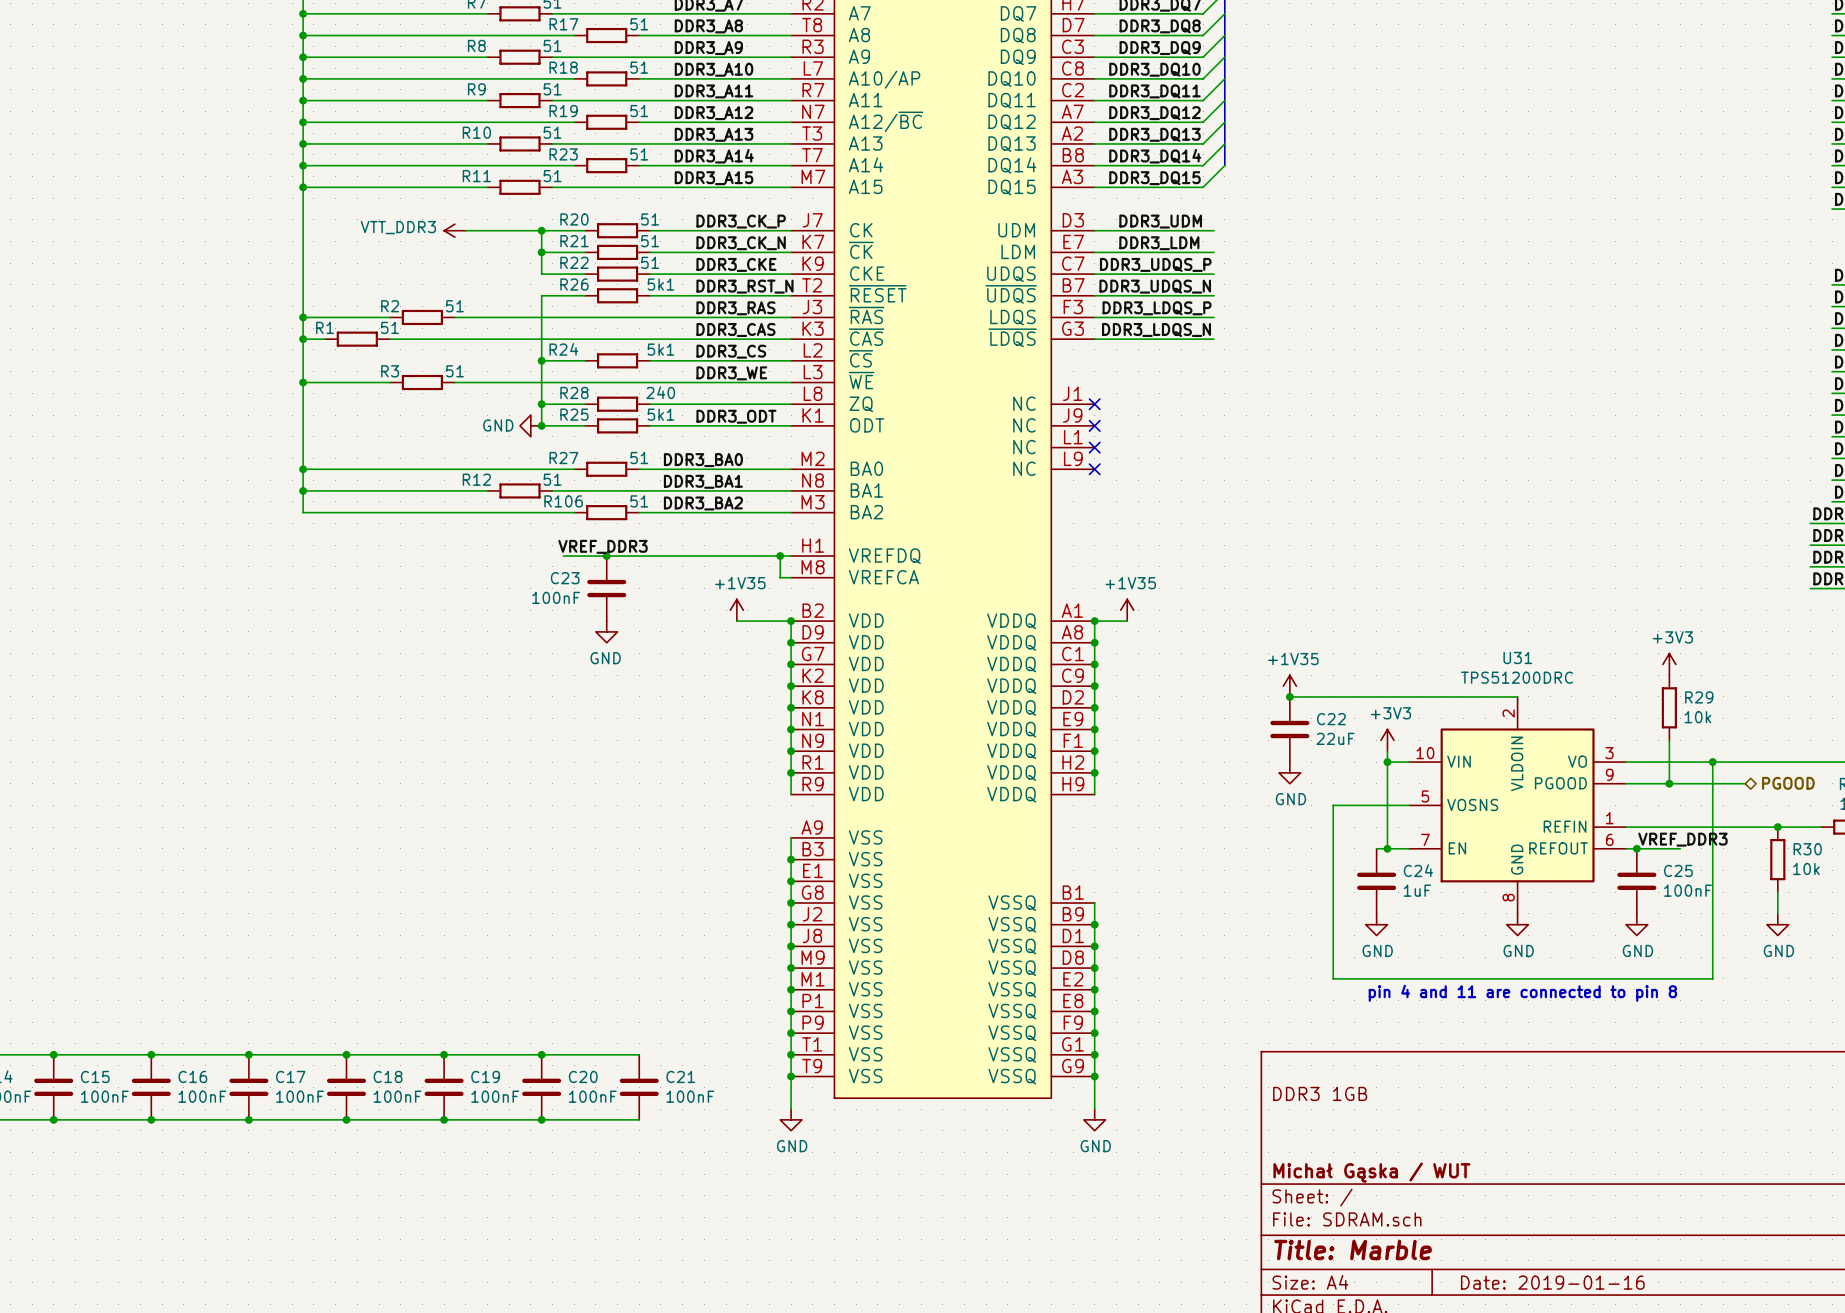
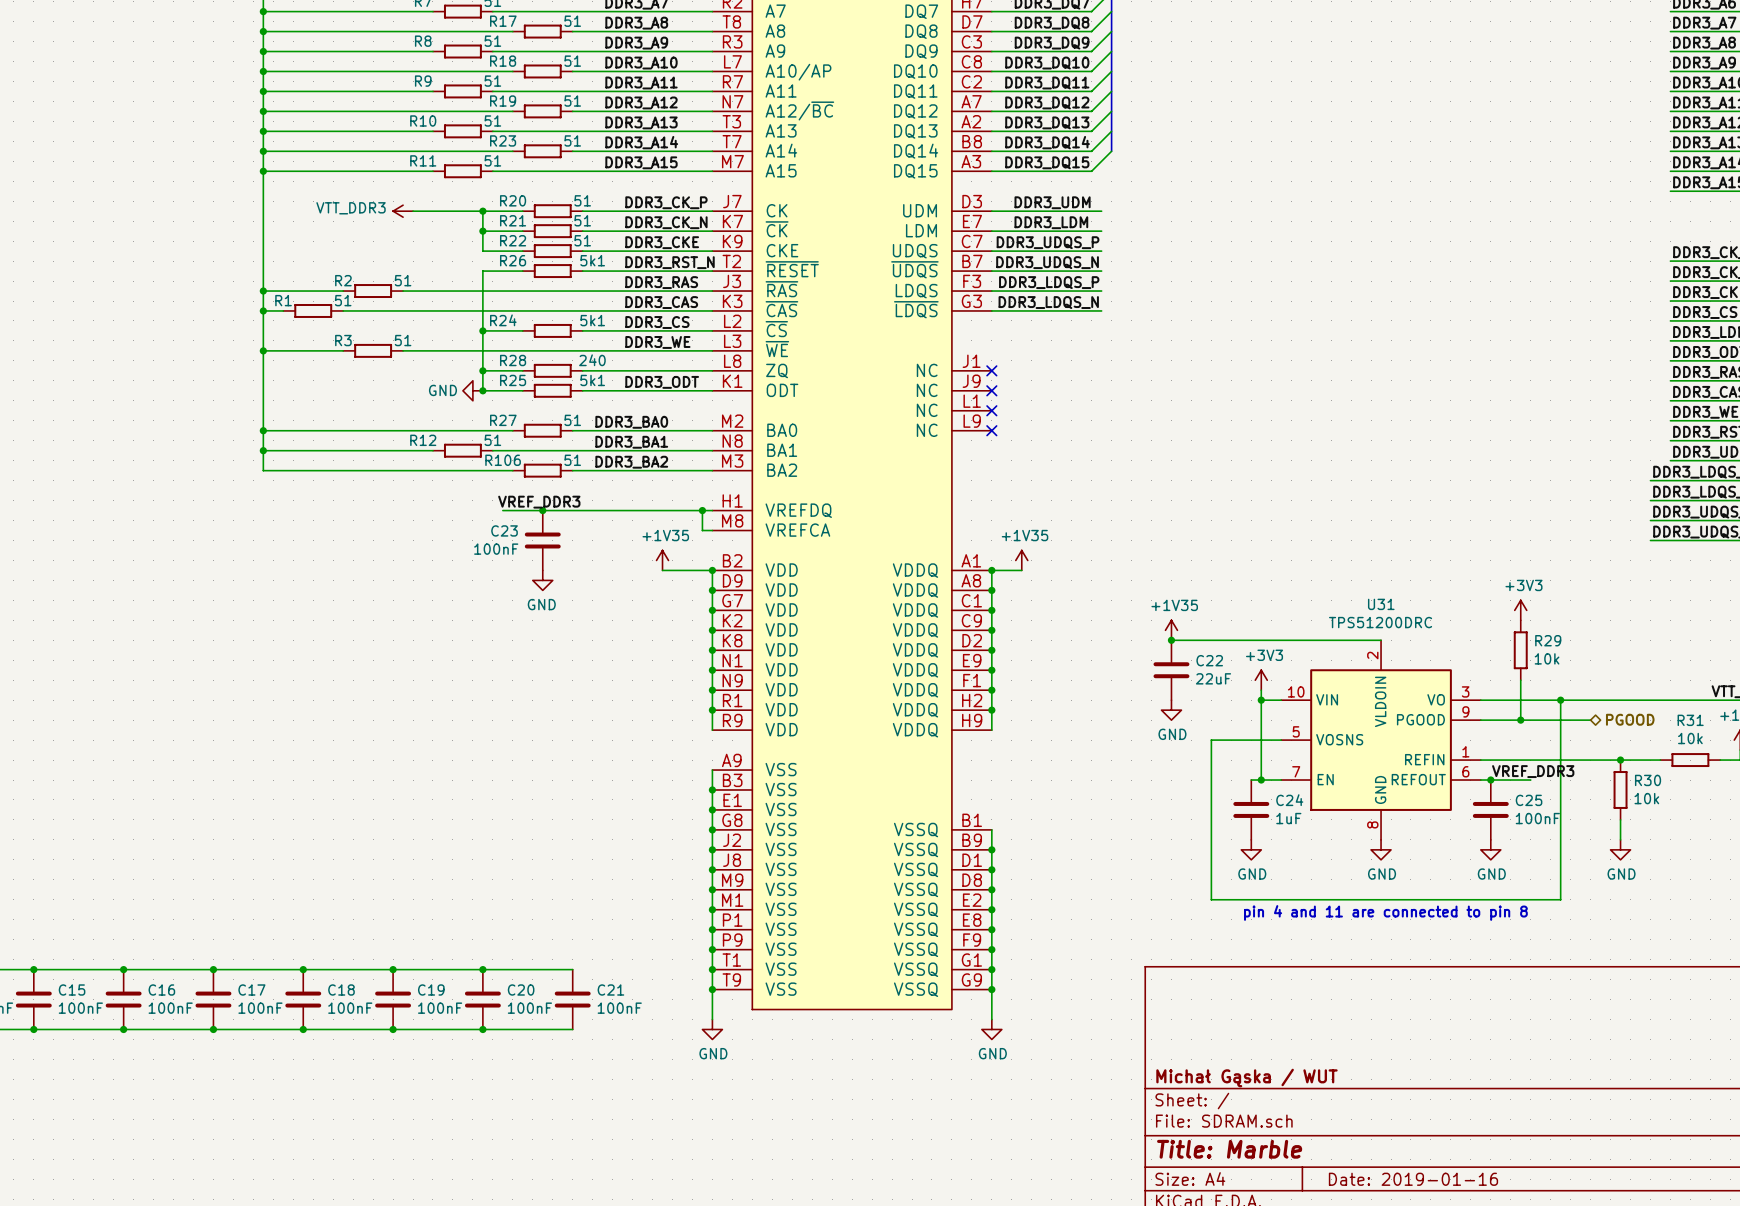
title block: DDR3 1GB (1320, 1093) -> none

